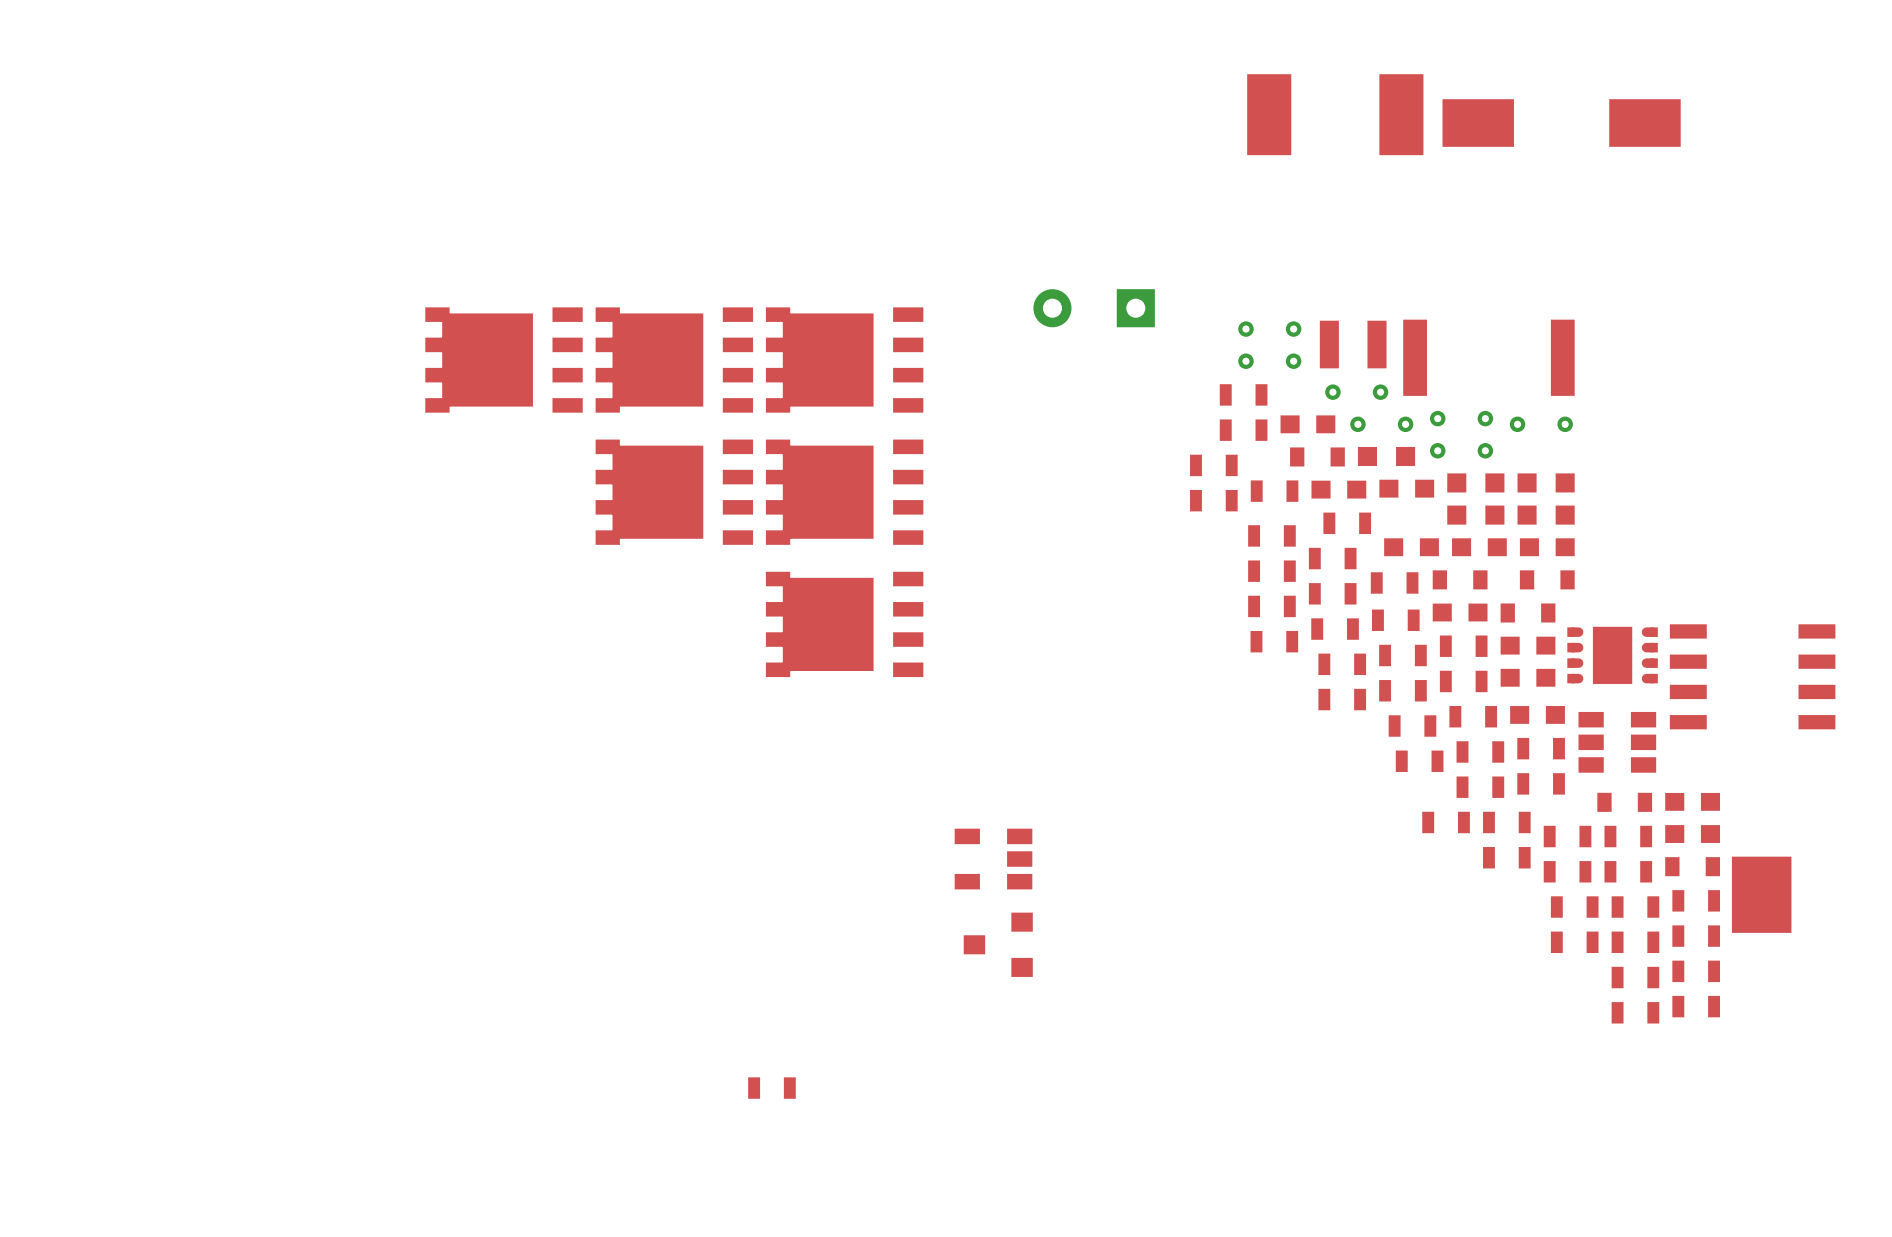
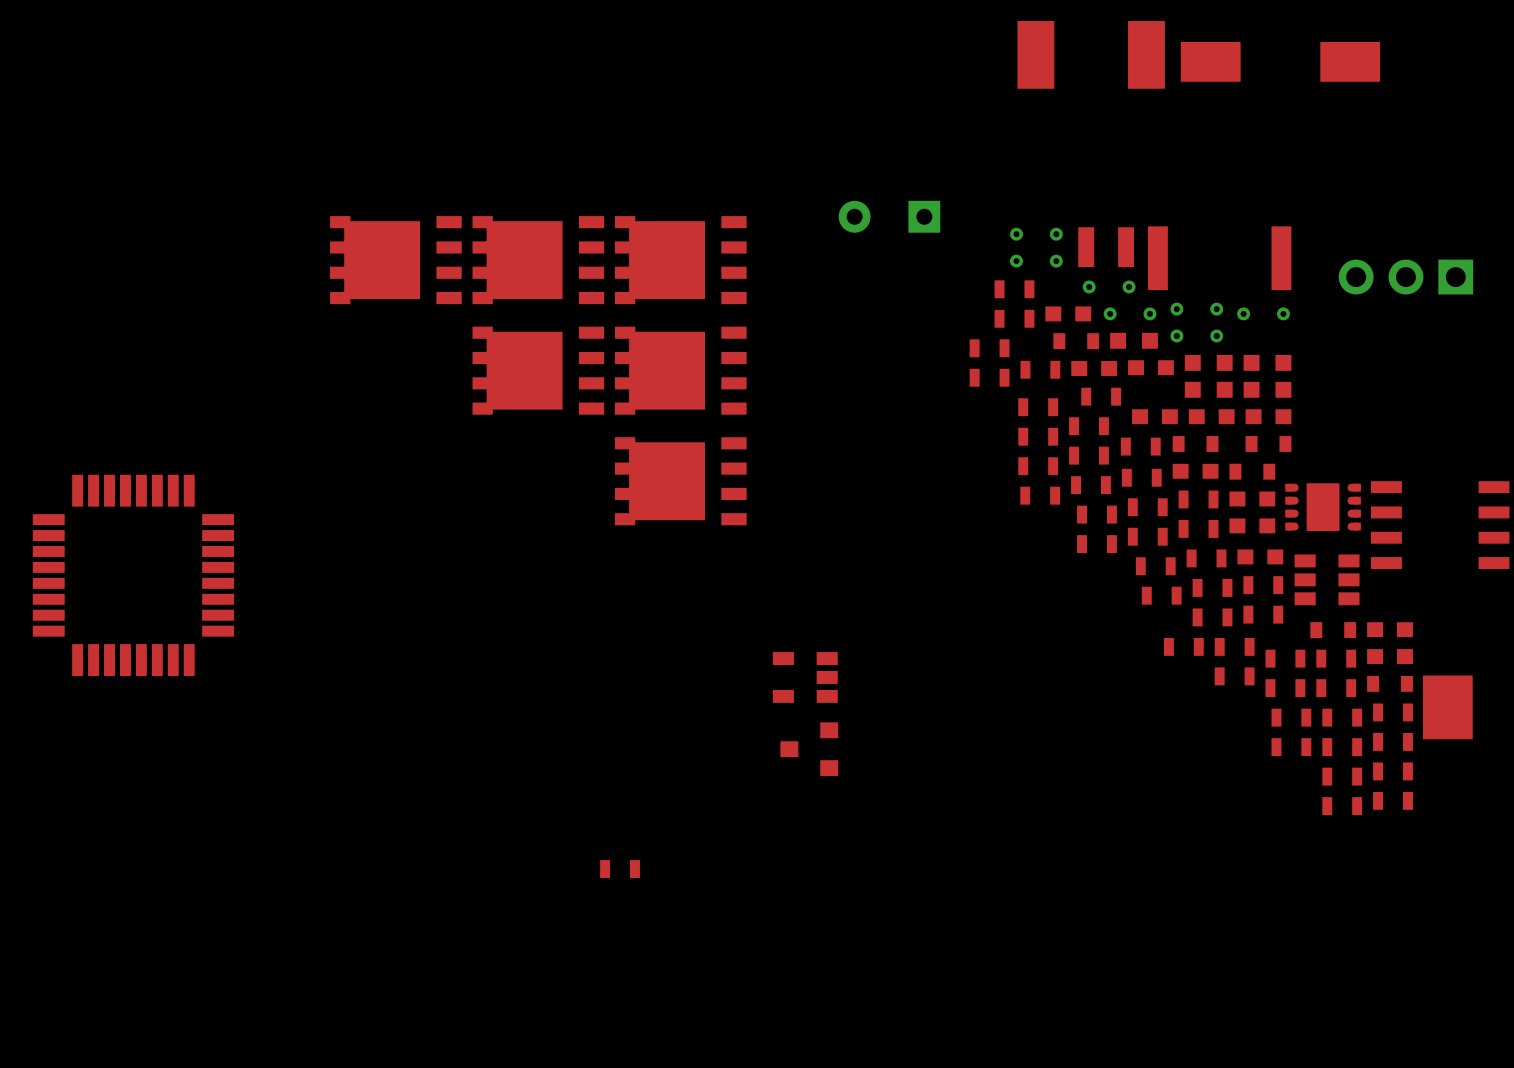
part: none -> (1405, 277)
part: none -> (133, 575)

